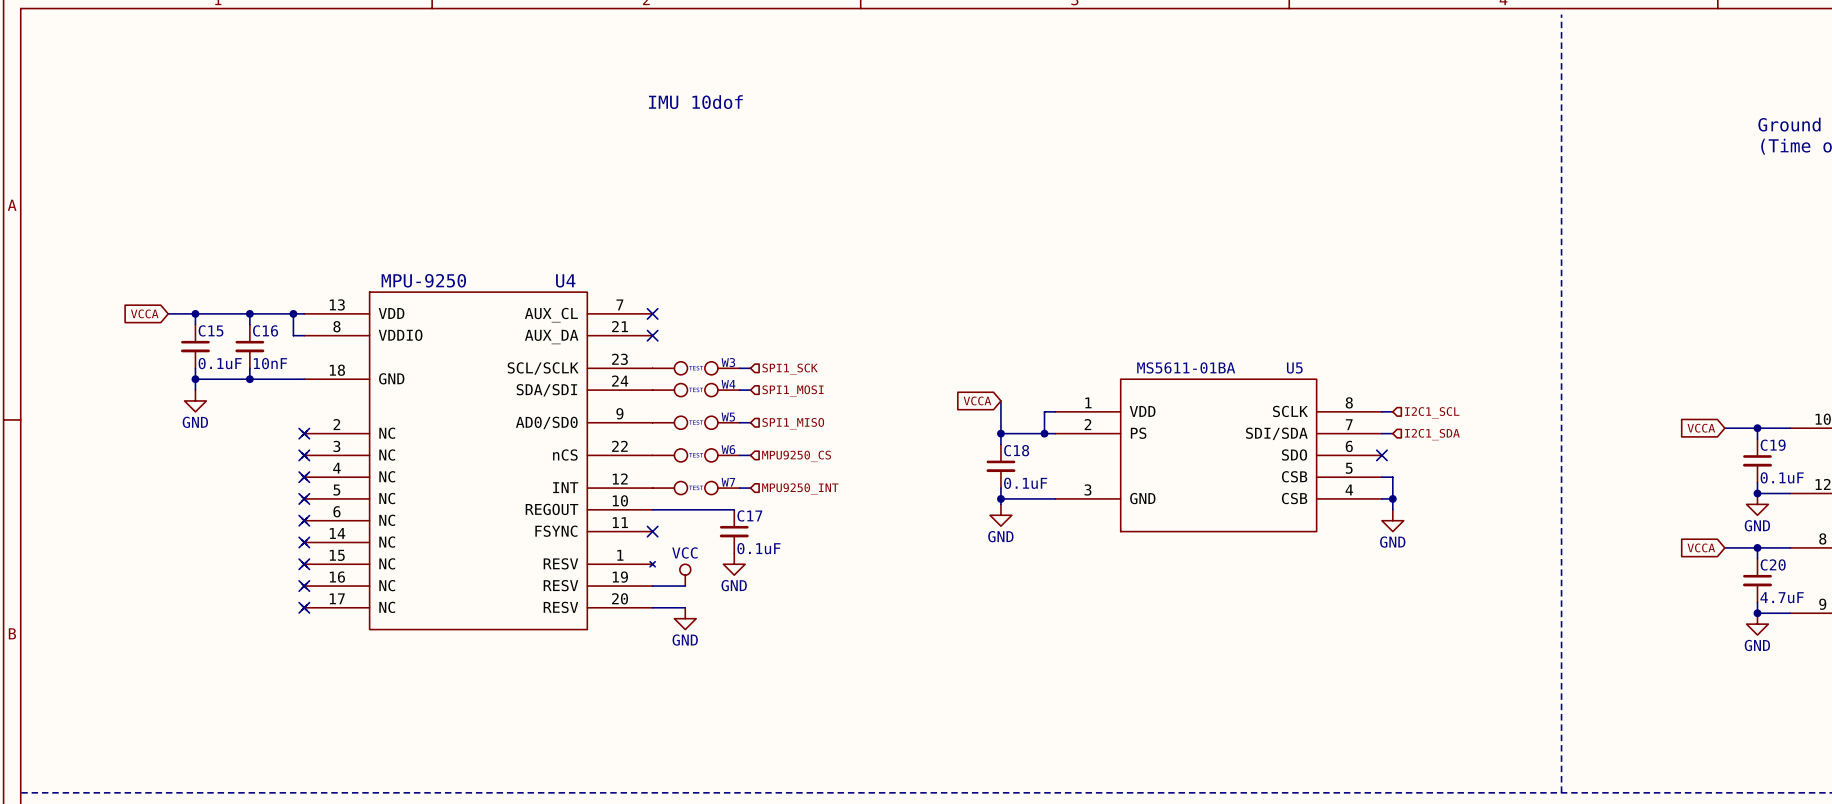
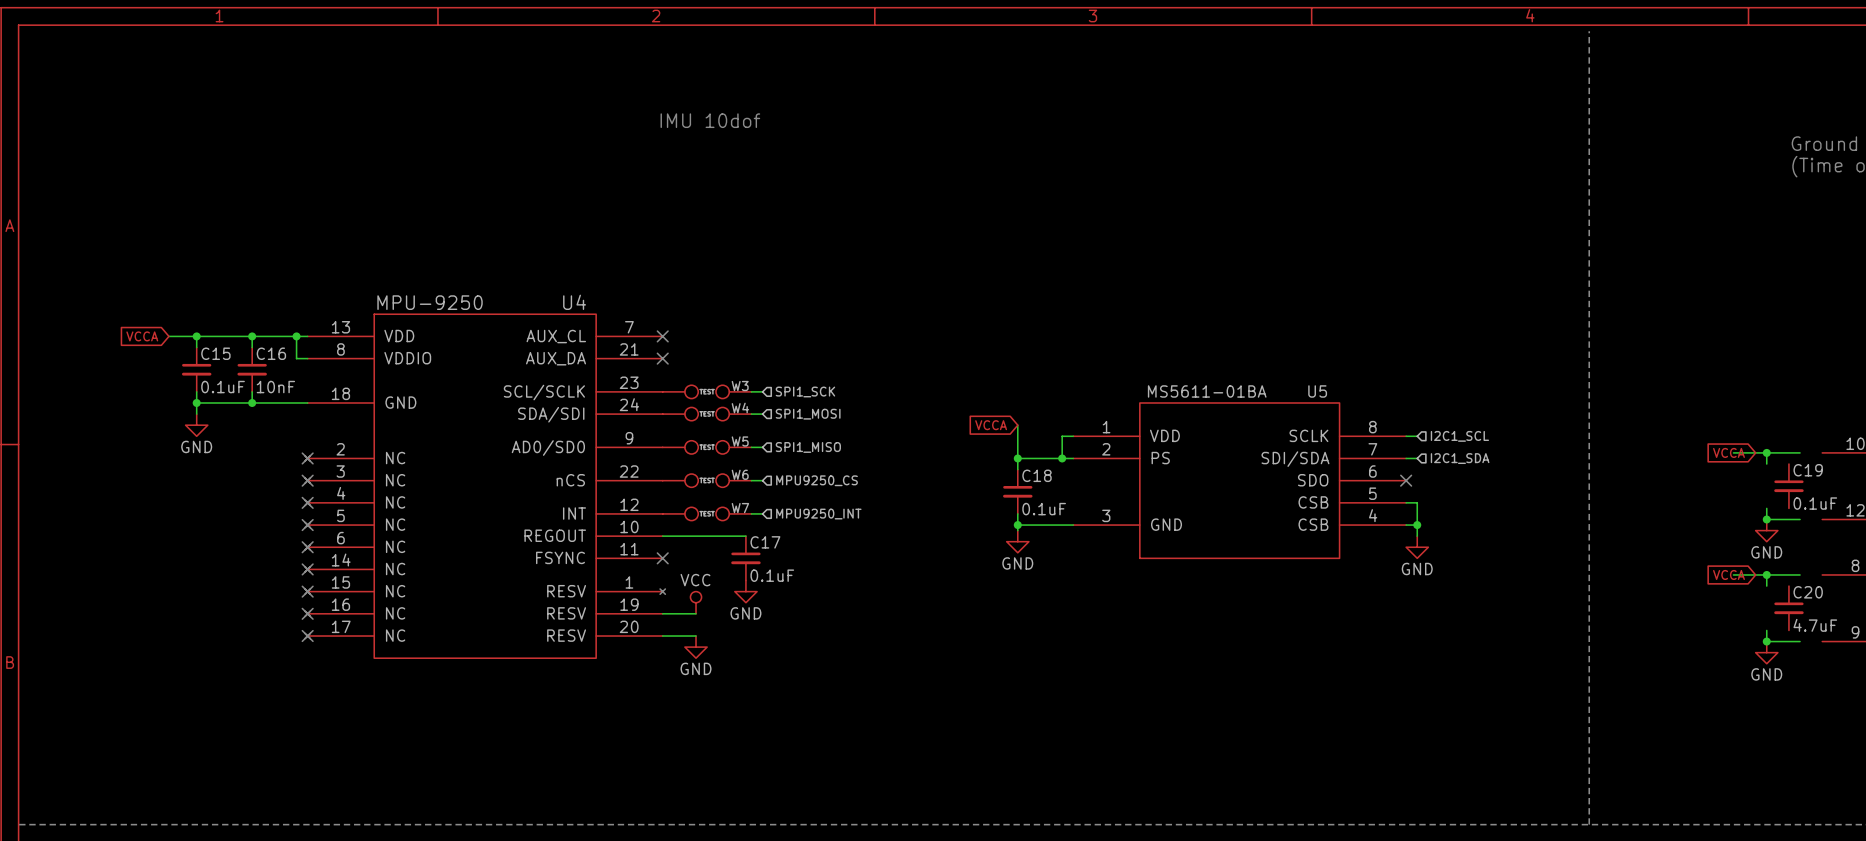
wire: (1757, 428) (1757, 439) -> (1766, 452) (1766, 464)
junction position: (1757, 428) -> (1766, 452)
wire: (1768, 428) (1790, 428) -> (1733, 452) (1755, 452)
wire: (1757, 482) (1757, 493) -> (1766, 508) (1766, 519) (1788, 519)
junction position: (1757, 493) -> (1766, 519)
wire: (1768, 493) (1790, 493) -> none
power symbol position: GND (1757, 504) -> GND (1766, 530)
wire: (1757, 547) (1757, 558) -> (1766, 574) (1766, 586)
junction position: (1757, 547) -> (1766, 574)
wire: (1768, 547) (1790, 547) -> (1733, 574) (1755, 574)
wire: (1757, 602) (1757, 613) -> (1766, 630) (1766, 641) (1788, 641)
junction position: (1757, 613) -> (1766, 641)
wire: (1768, 613) (1790, 613) -> none
power symbol position: GND (1757, 624) -> GND (1766, 652)

